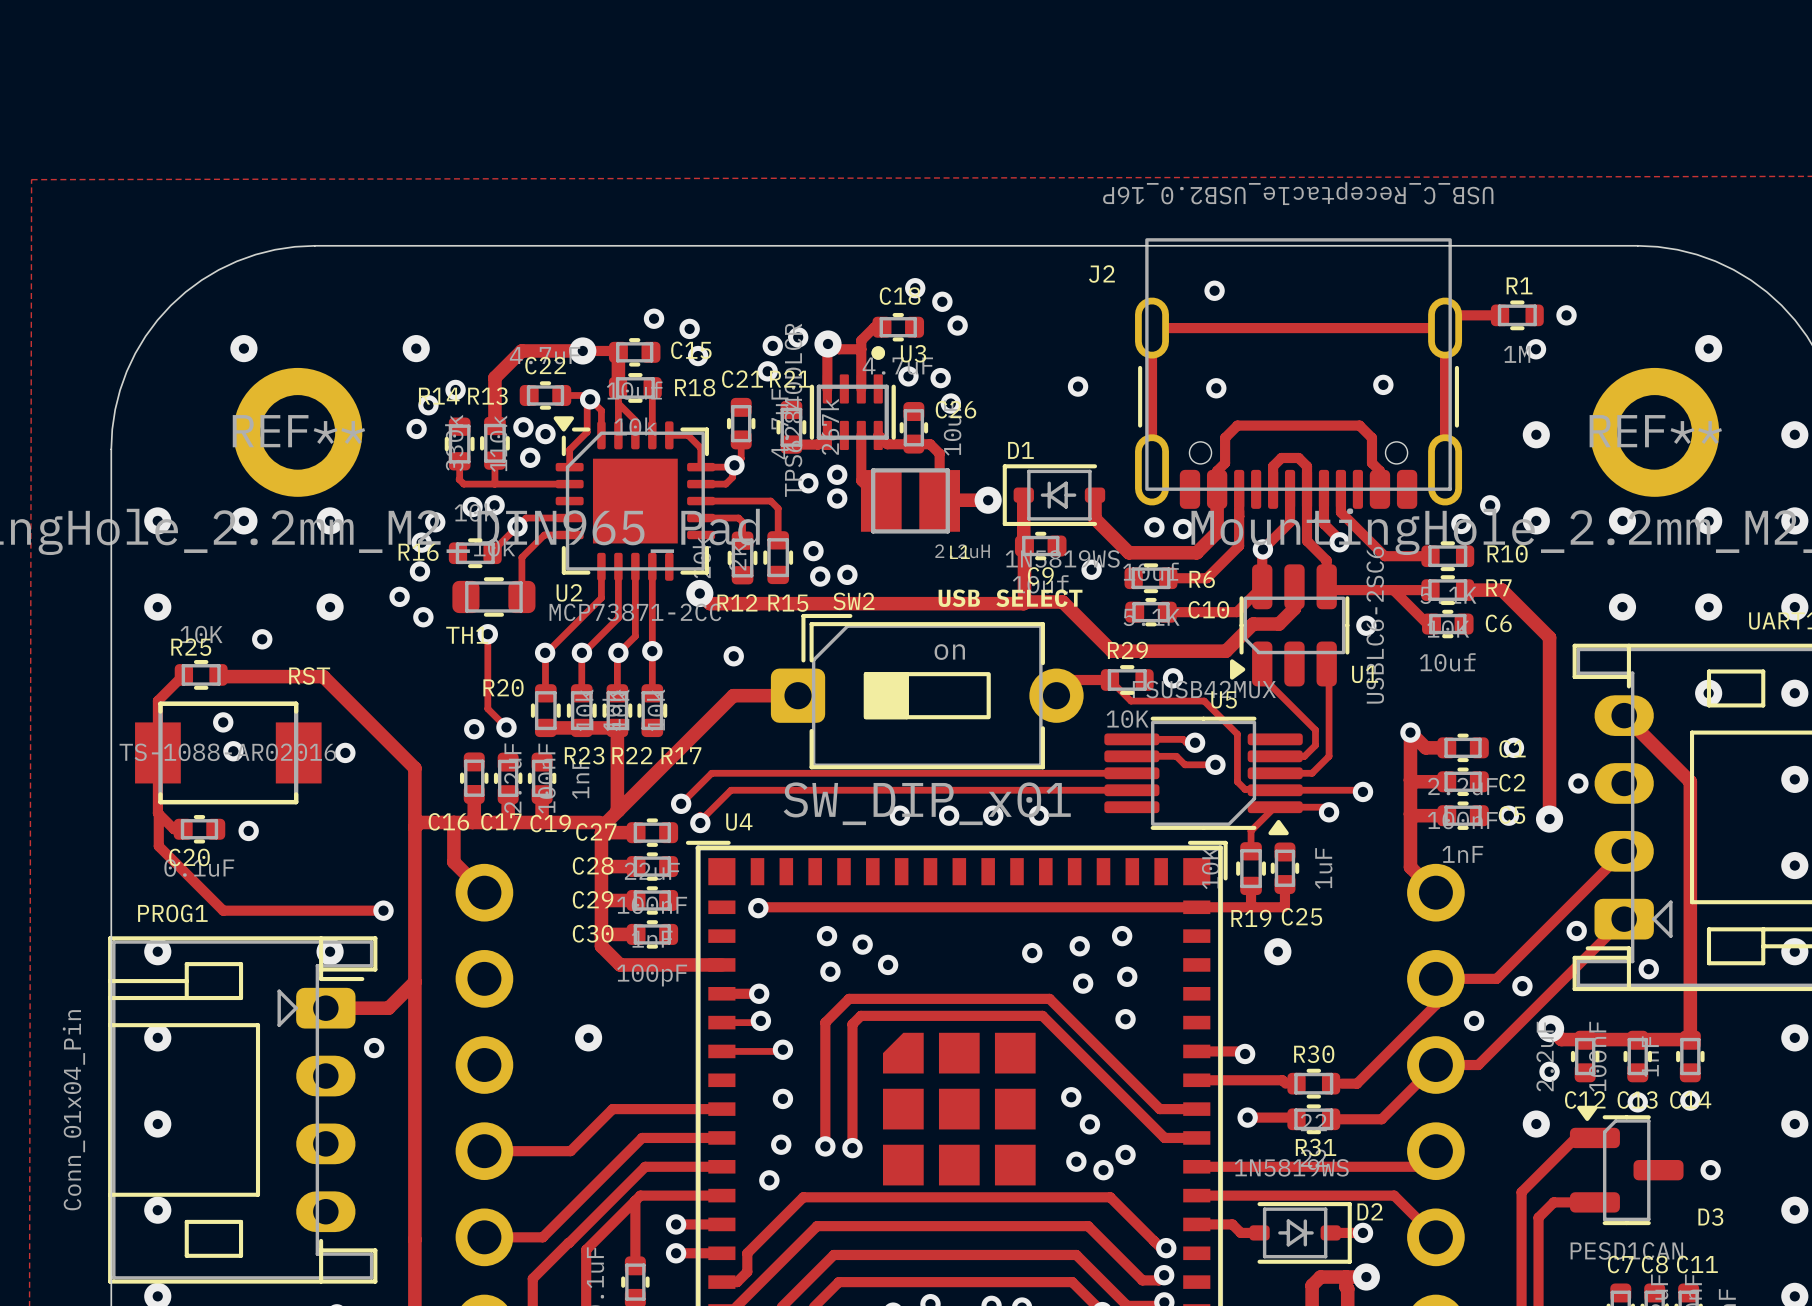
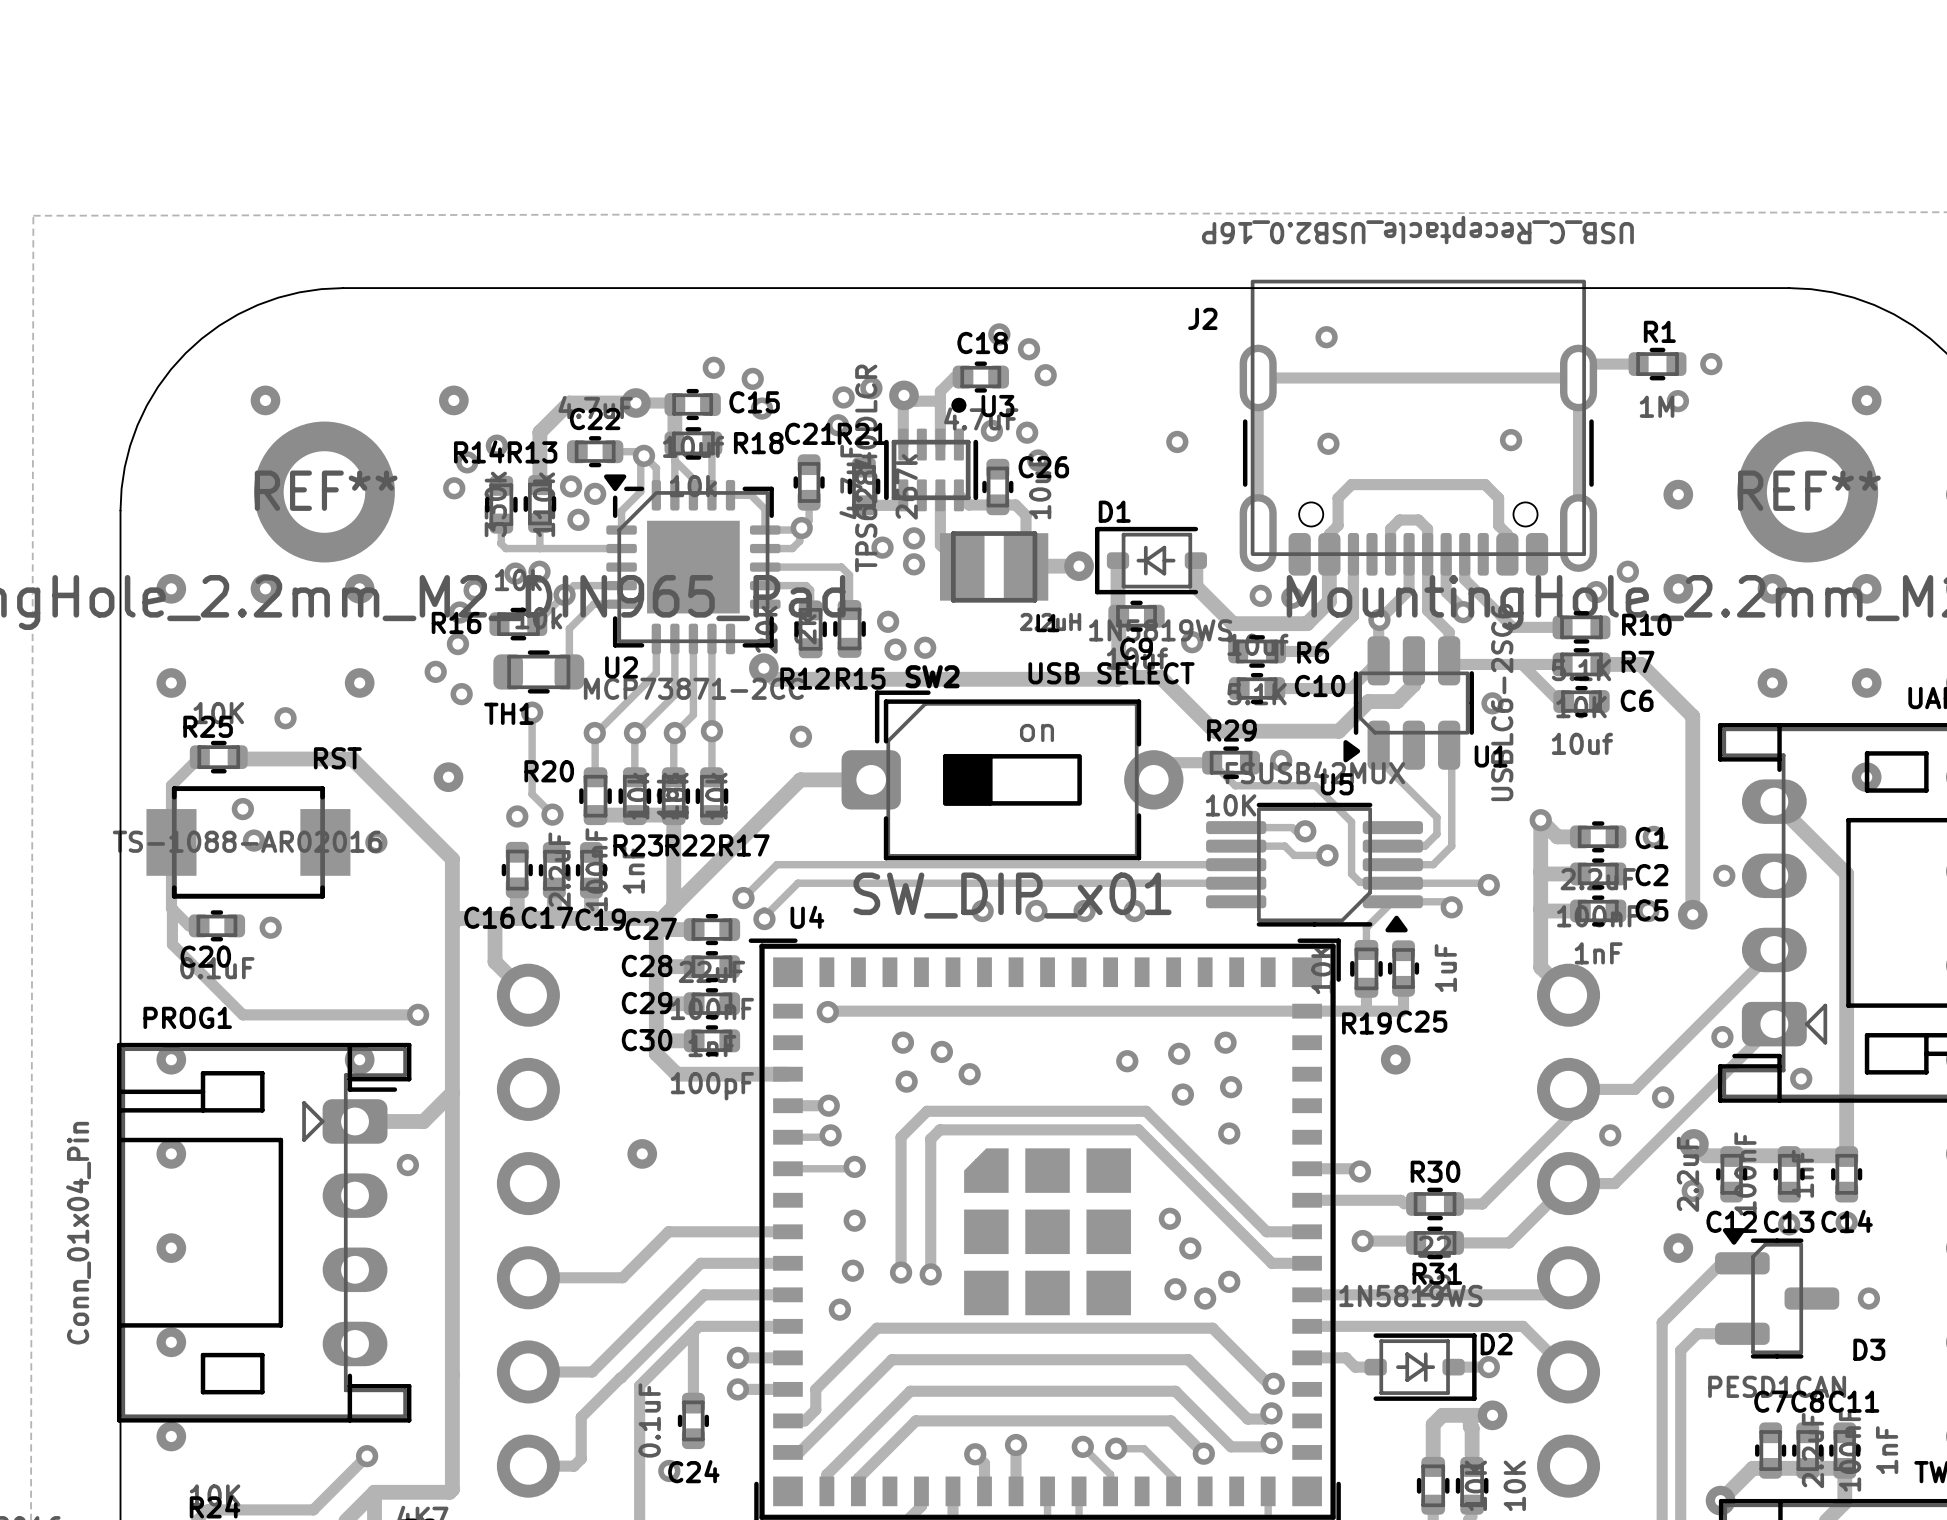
via: none -> (448, 777)

